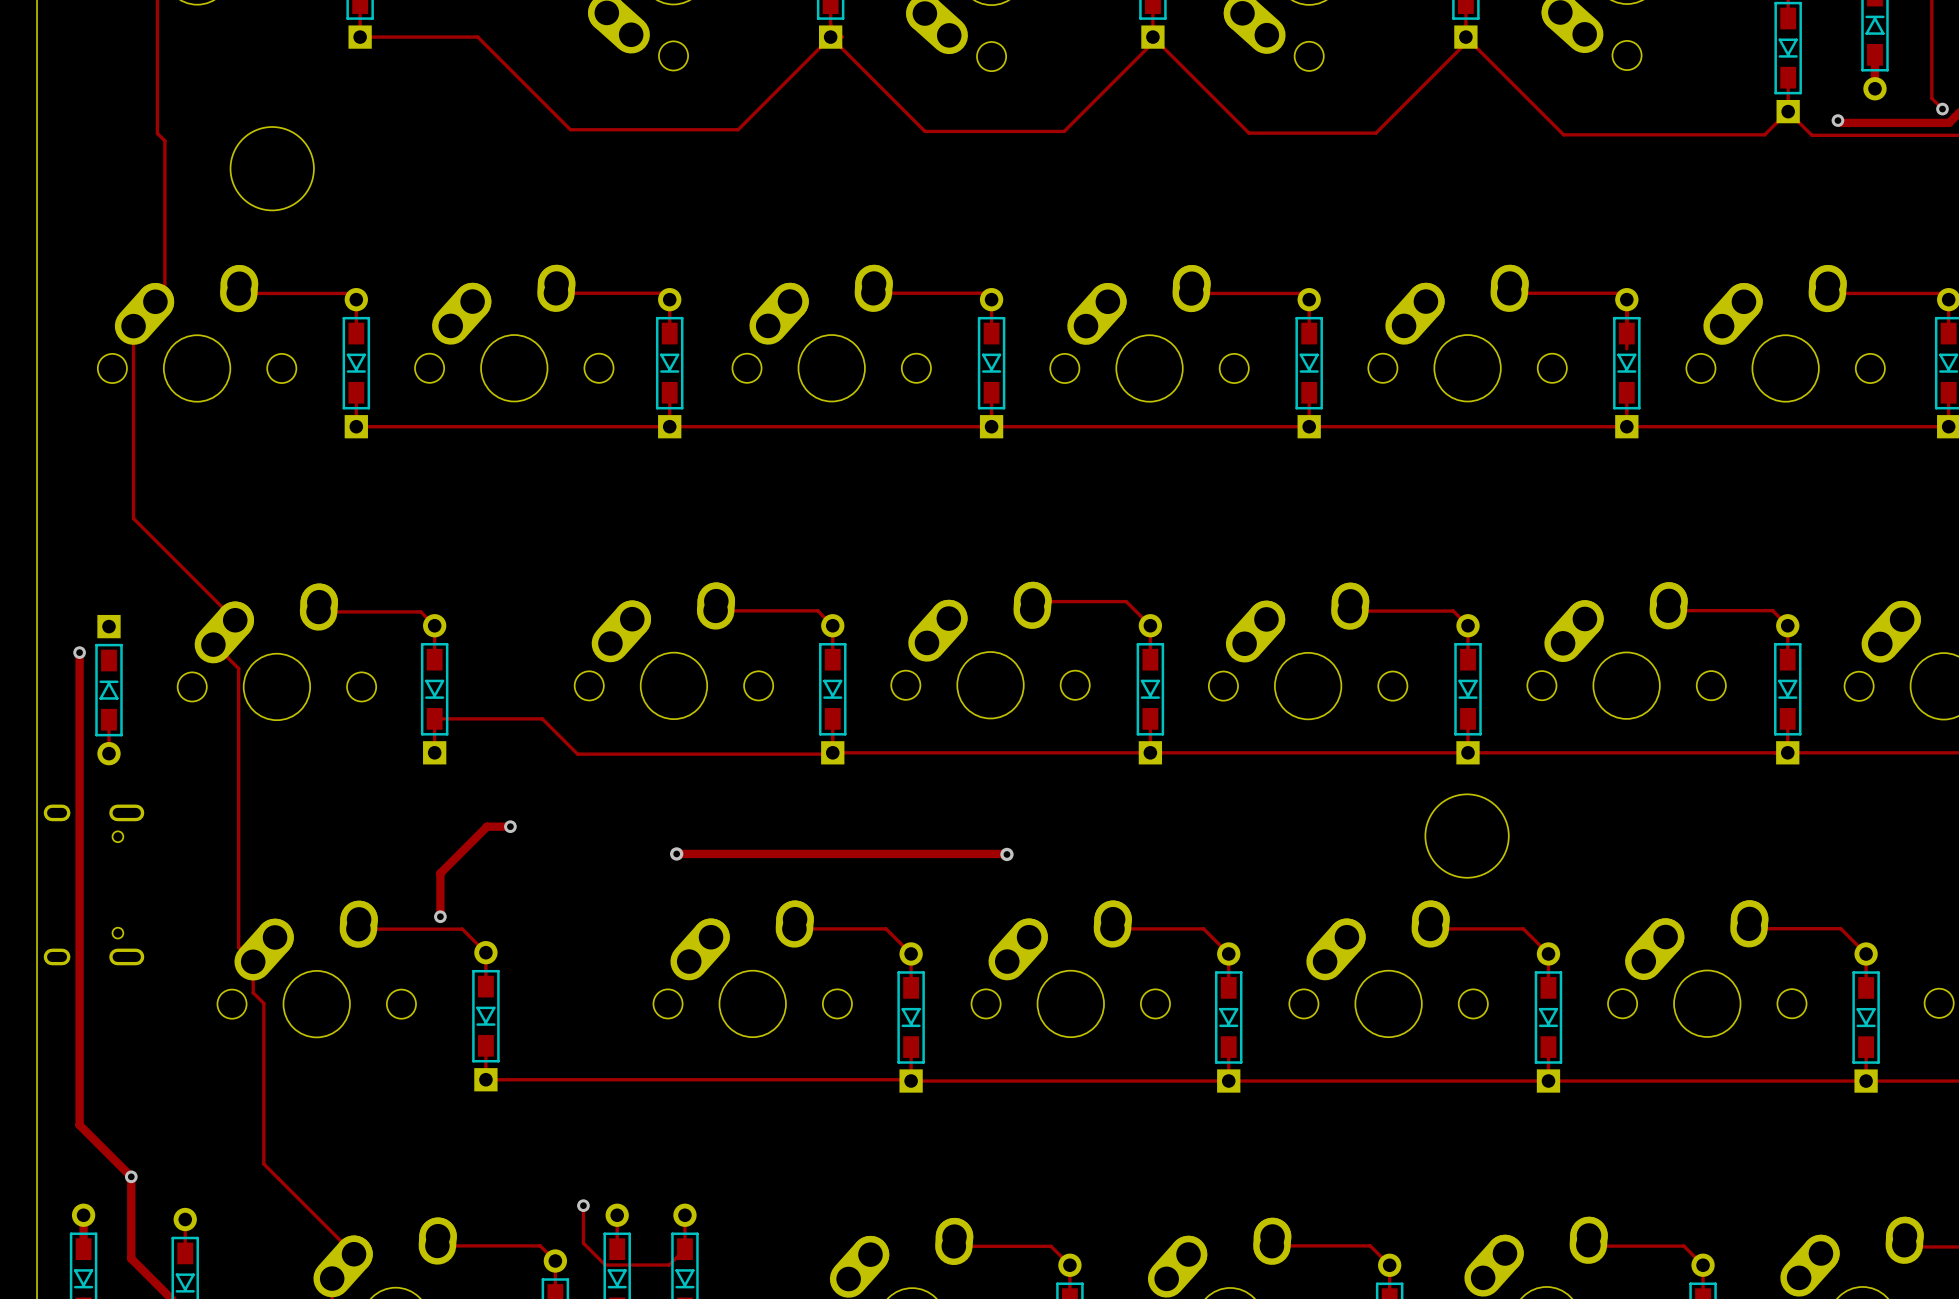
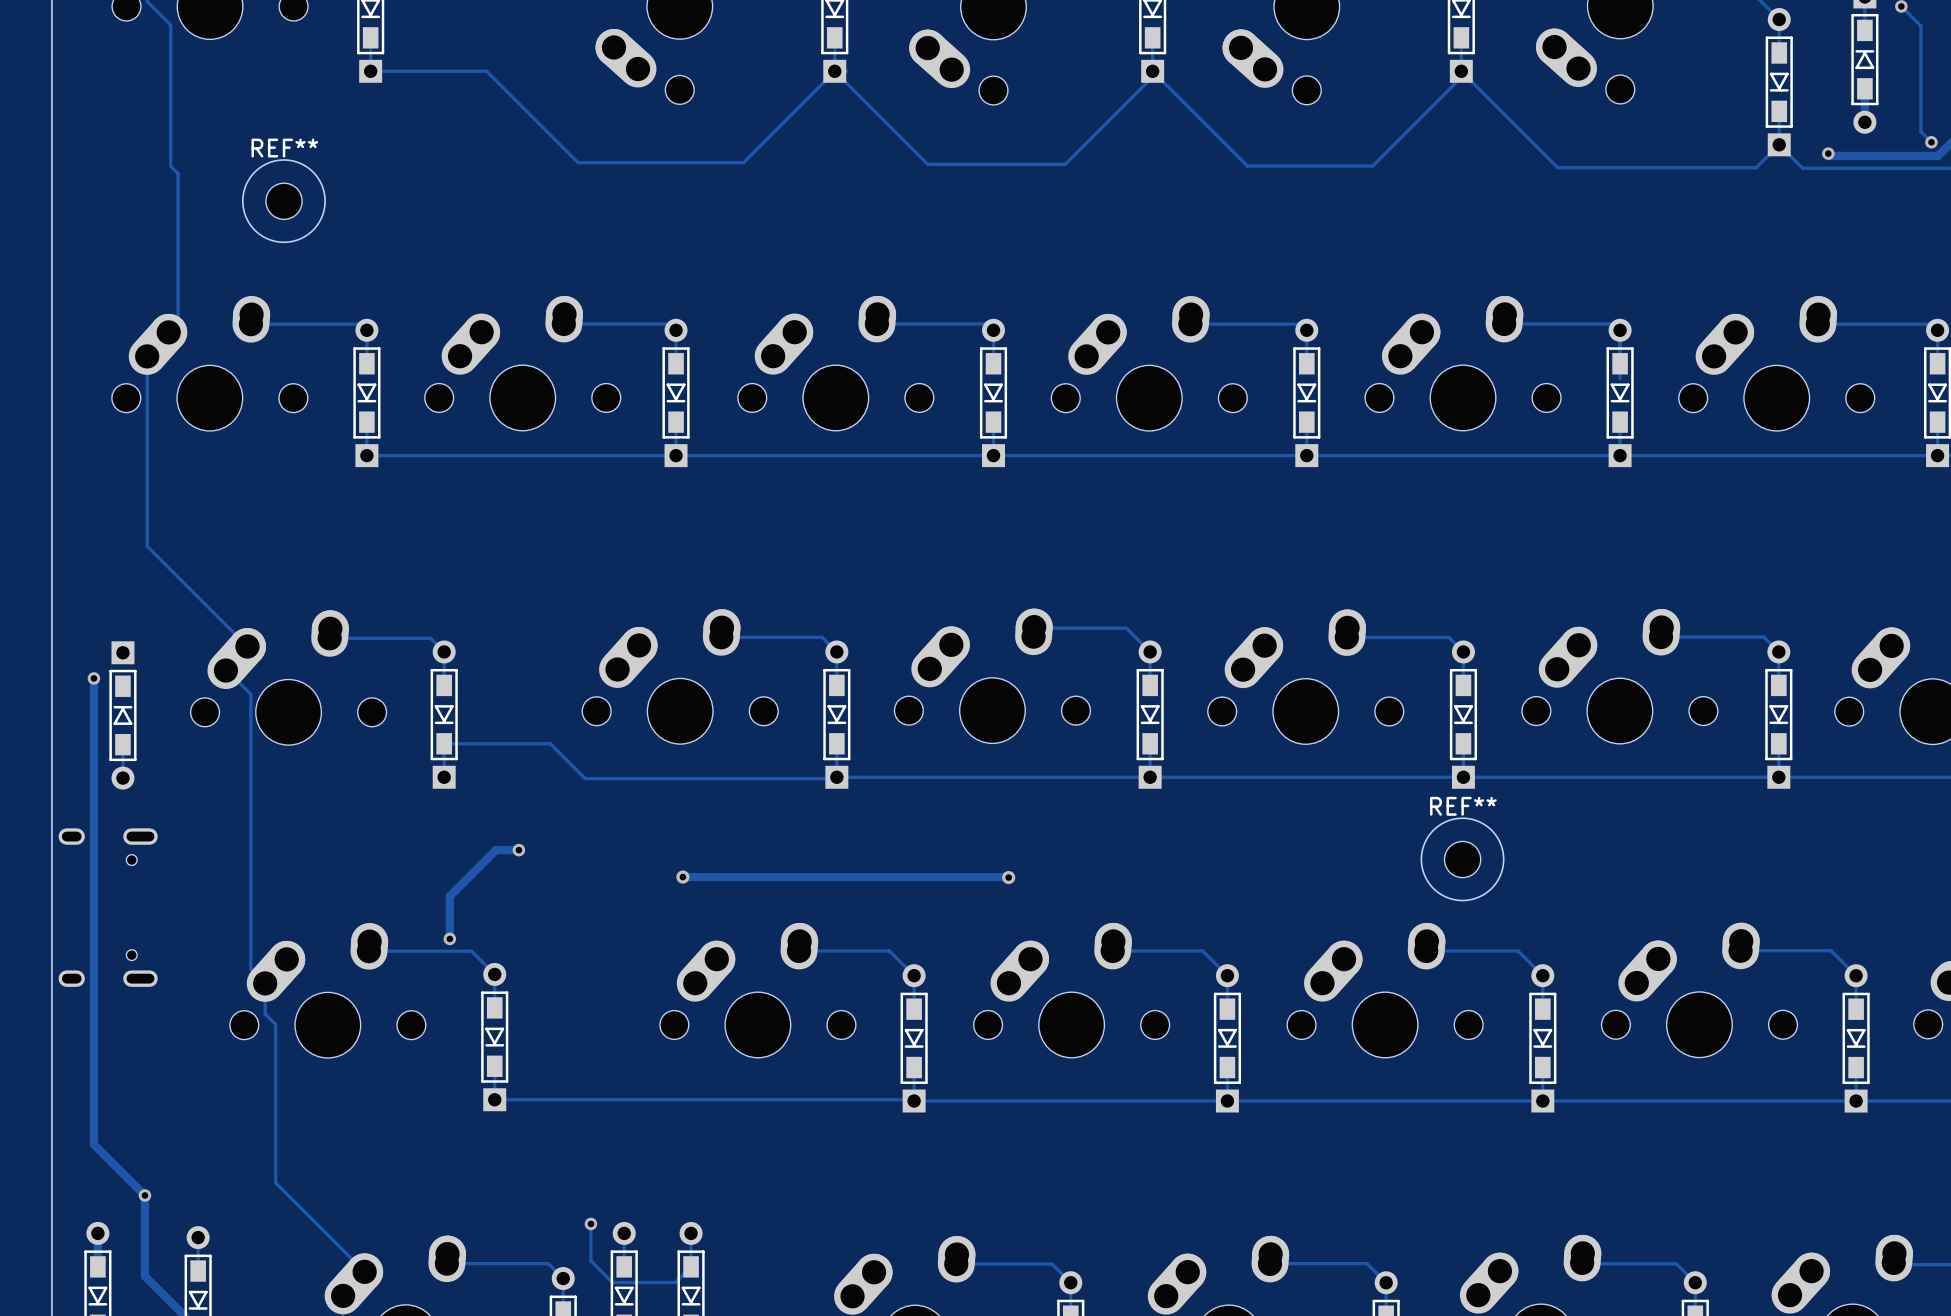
REF**: none -> (284, 201)
REF**: none -> (1462, 859)

